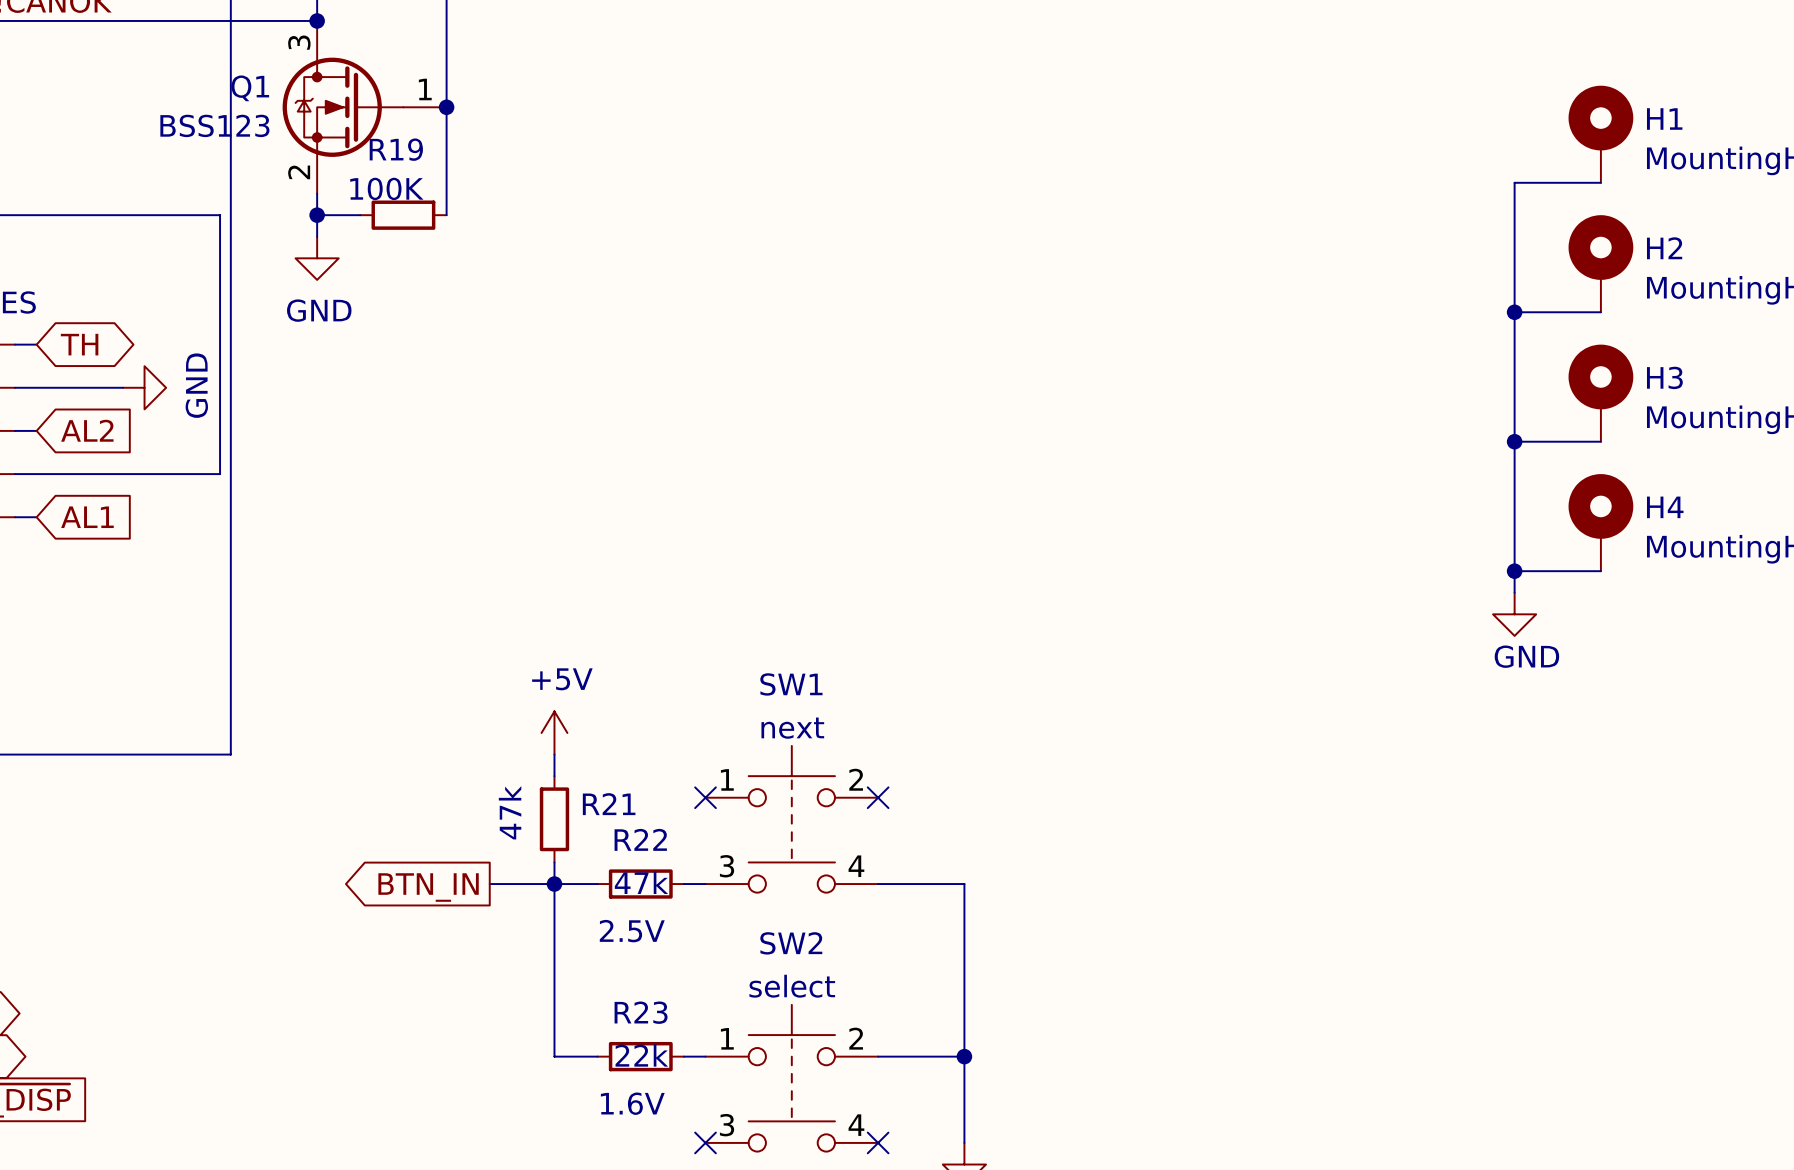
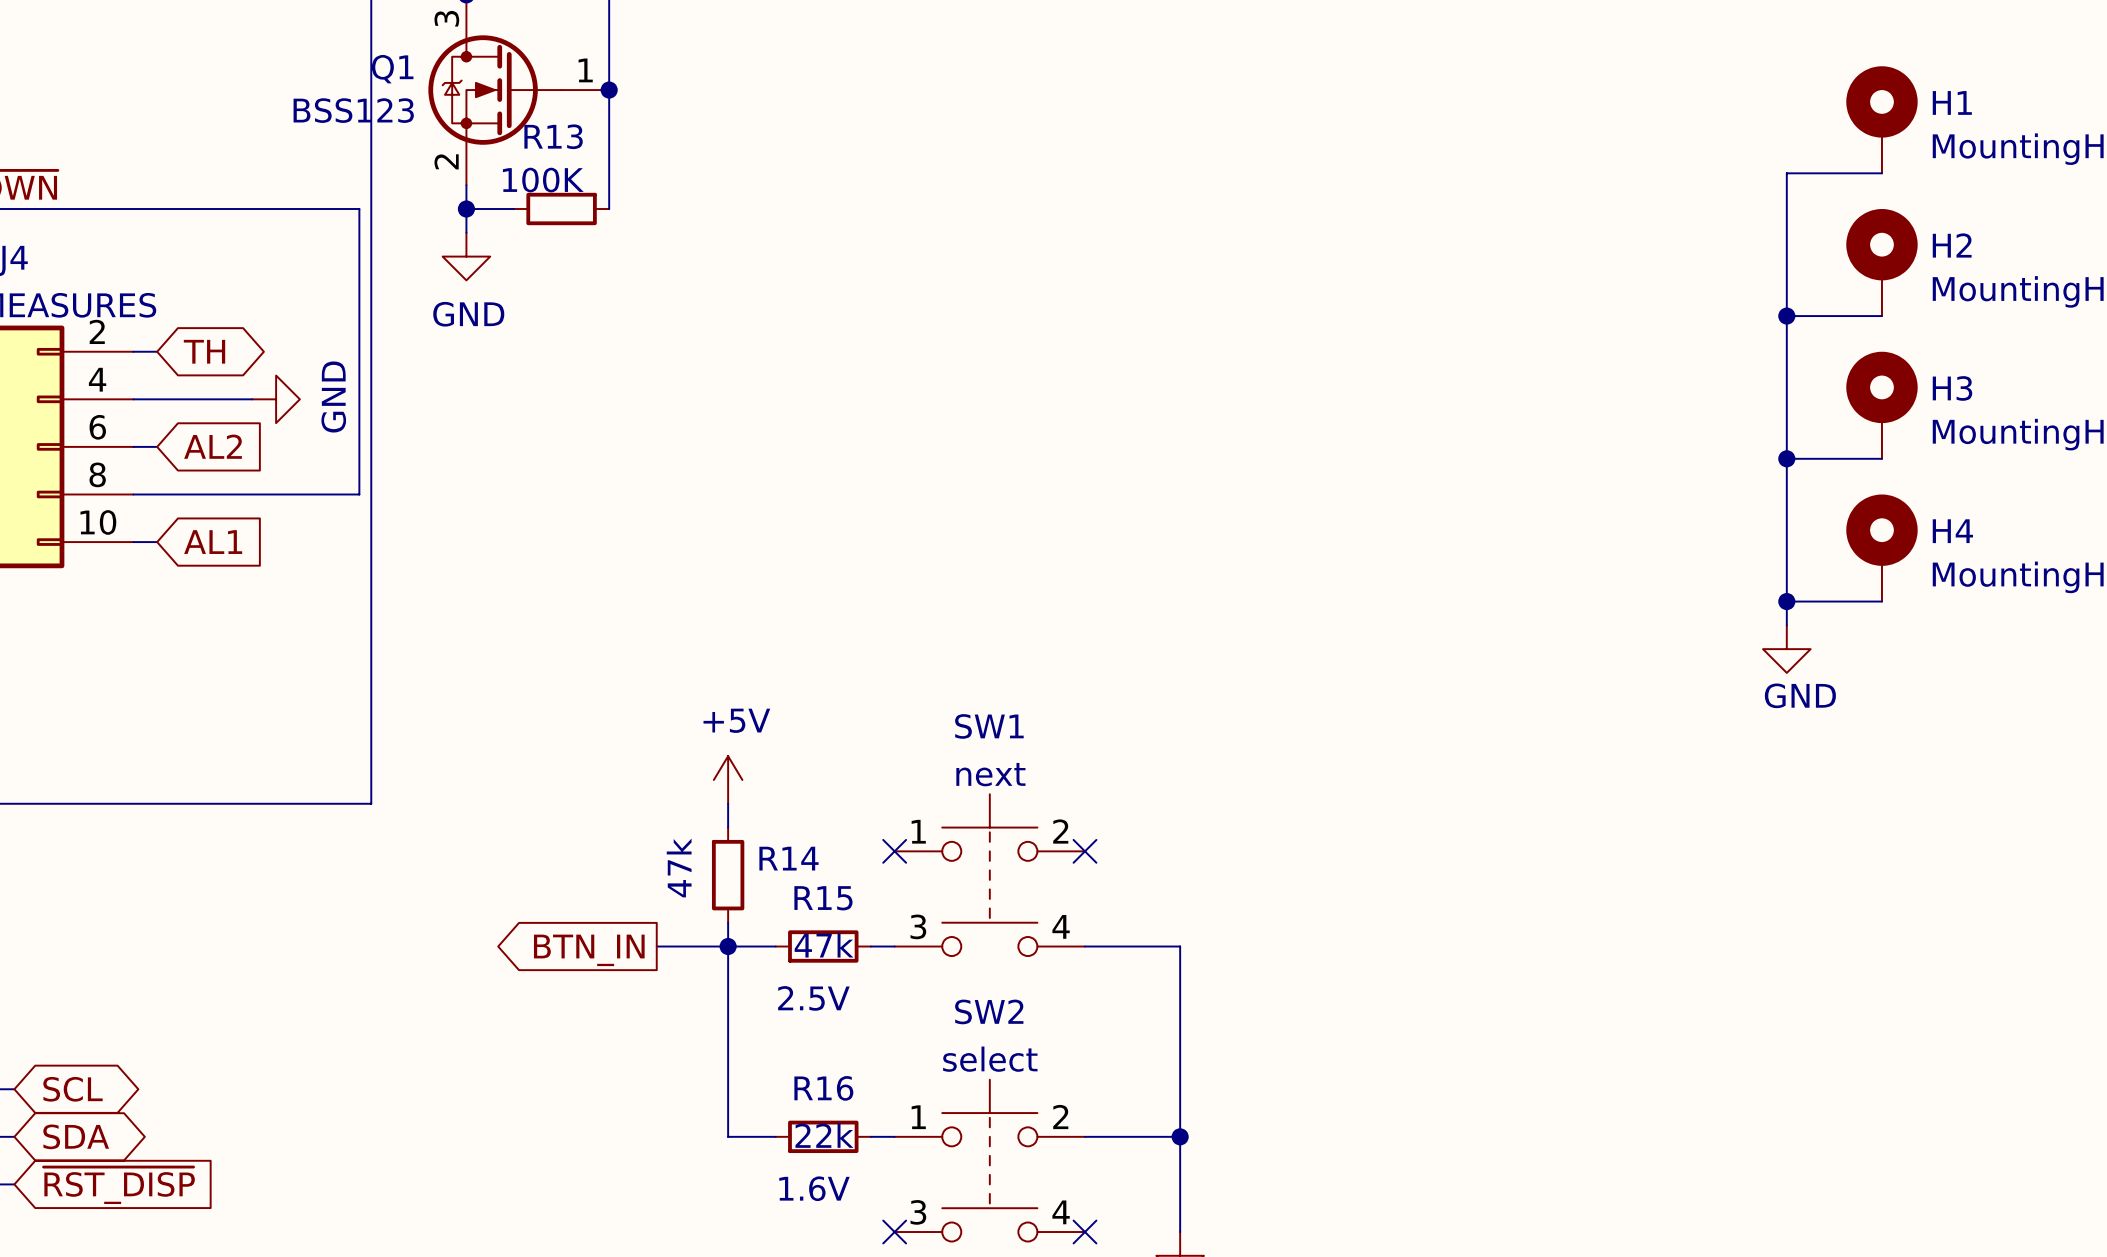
R19 name: R19 (396, 149) -> R13 (553, 136)
R21 name: R21 (609, 804) -> R14 (788, 858)
R22 name: R22 (640, 839) -> R15 (823, 898)
R23 name: R23 (641, 1012) -> R16 (823, 1088)

